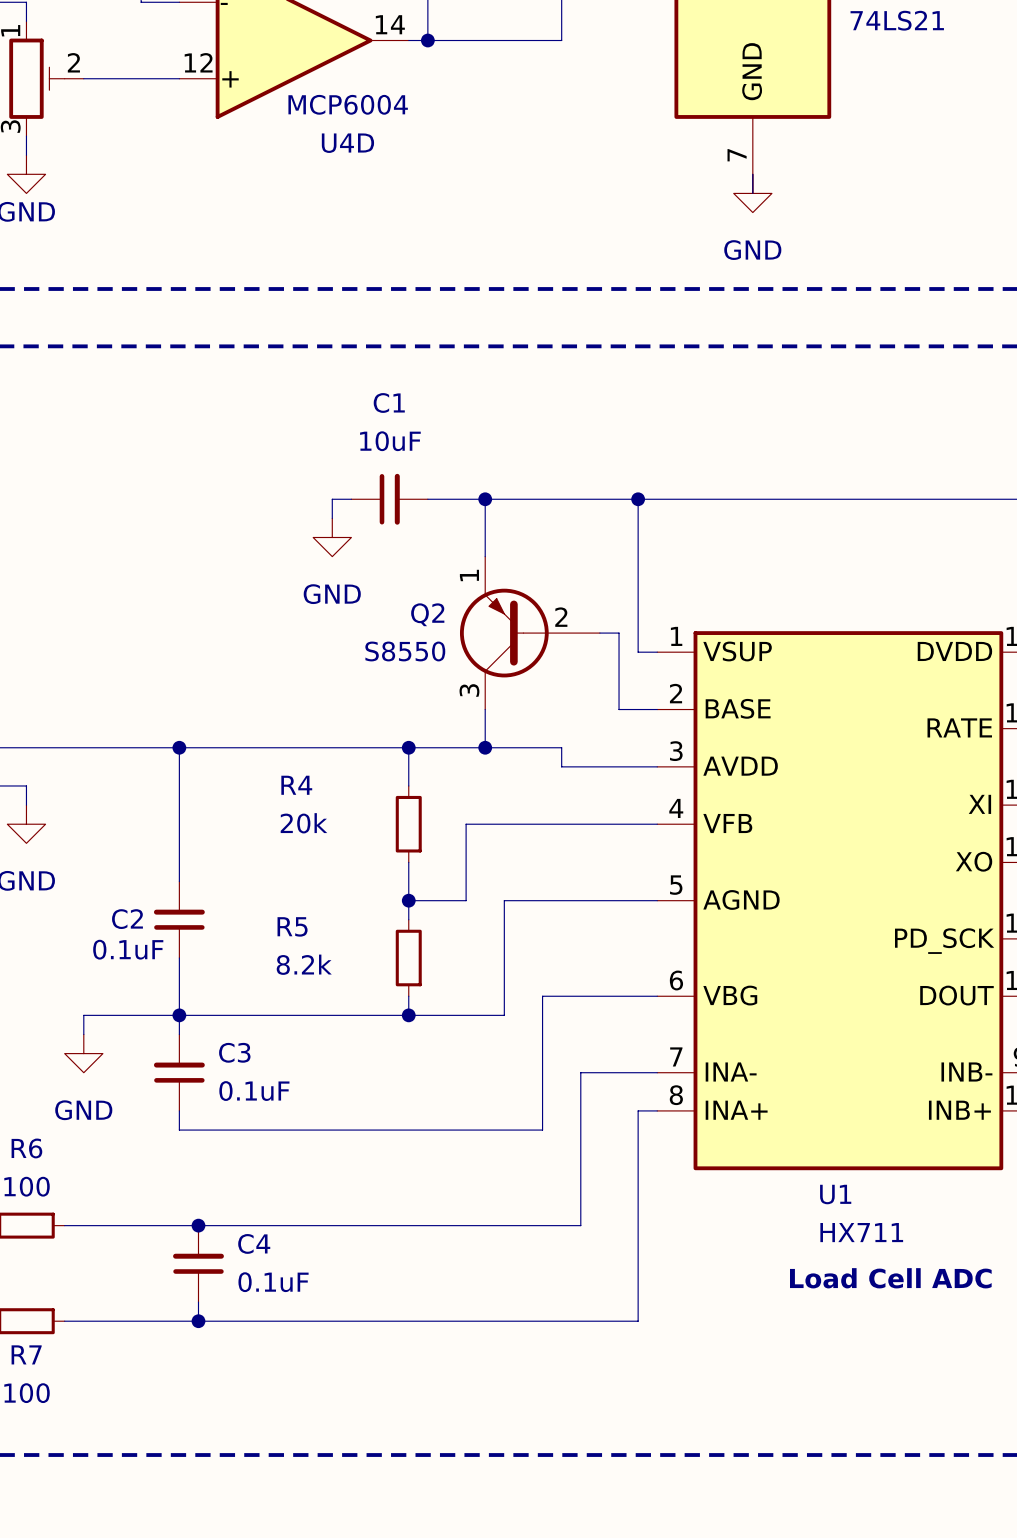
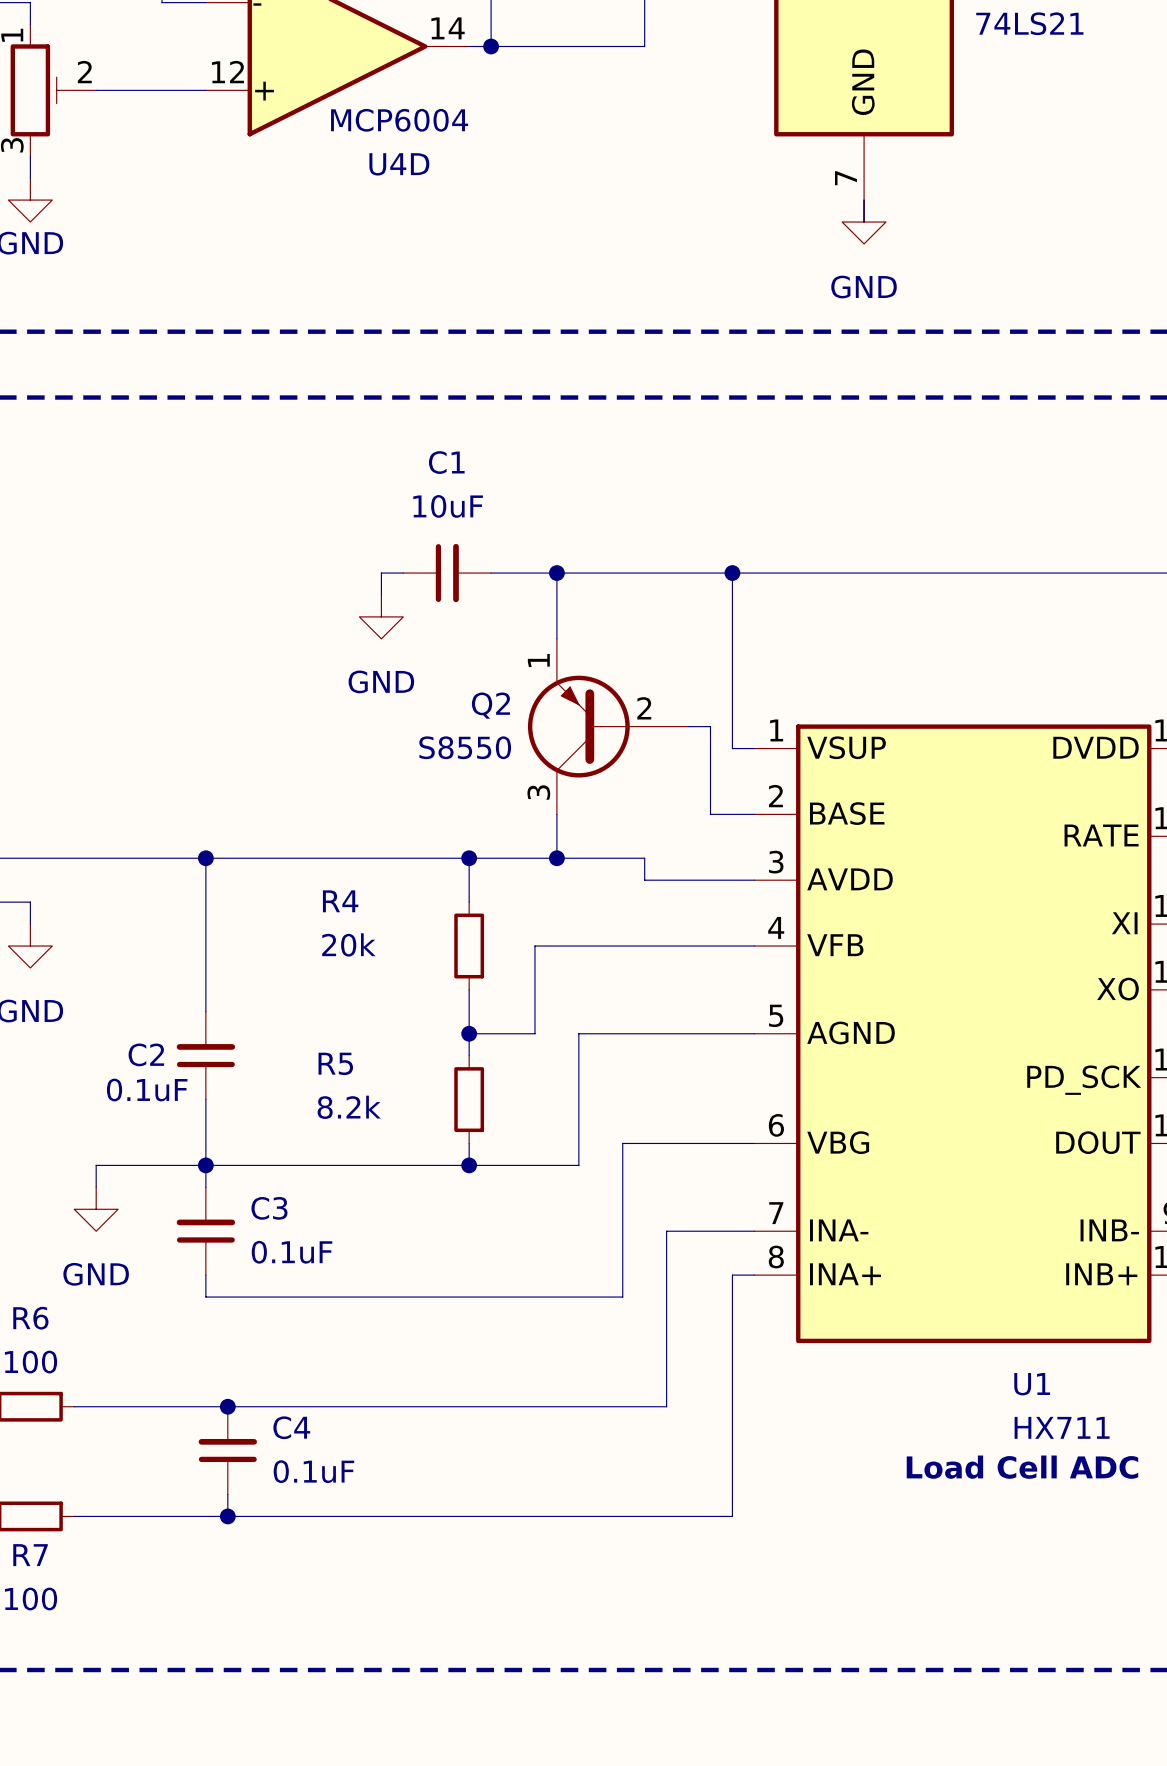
U1 name position: U1 (835, 1194) -> U1 (1032, 1384)
U1 value position: HX711 (861, 1232) -> HX711 (1062, 1427)

